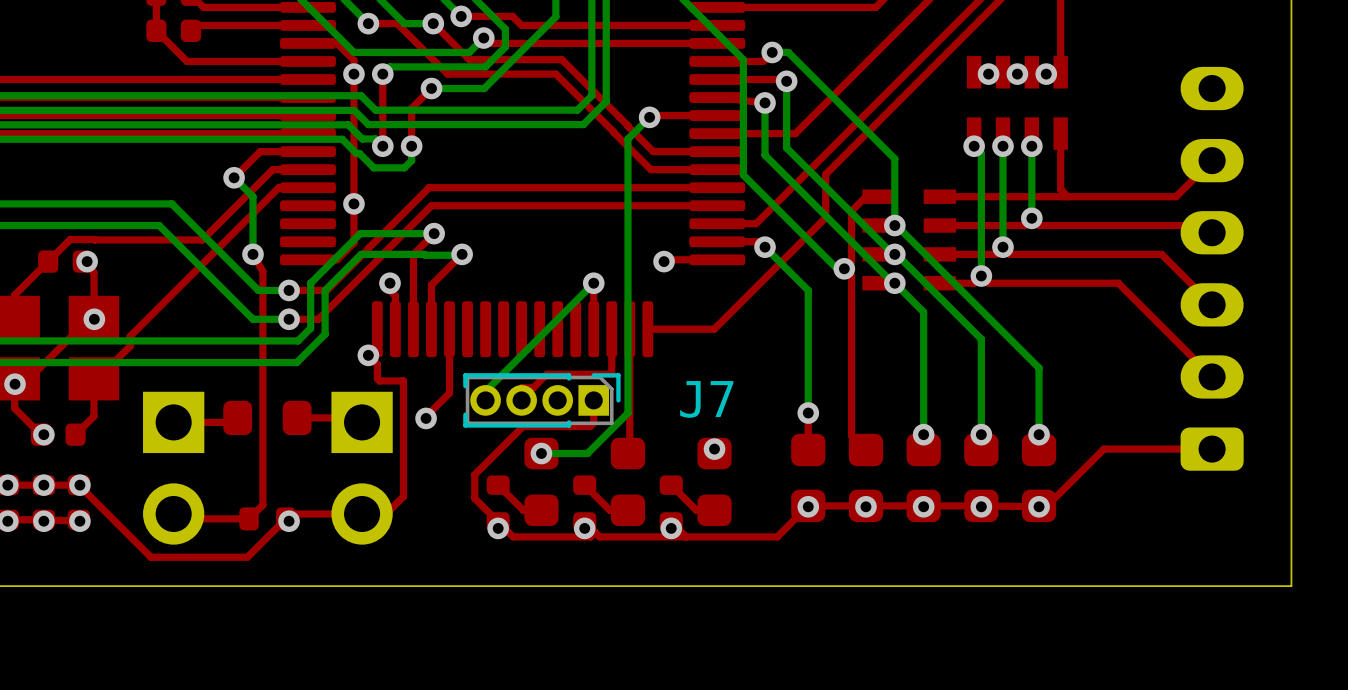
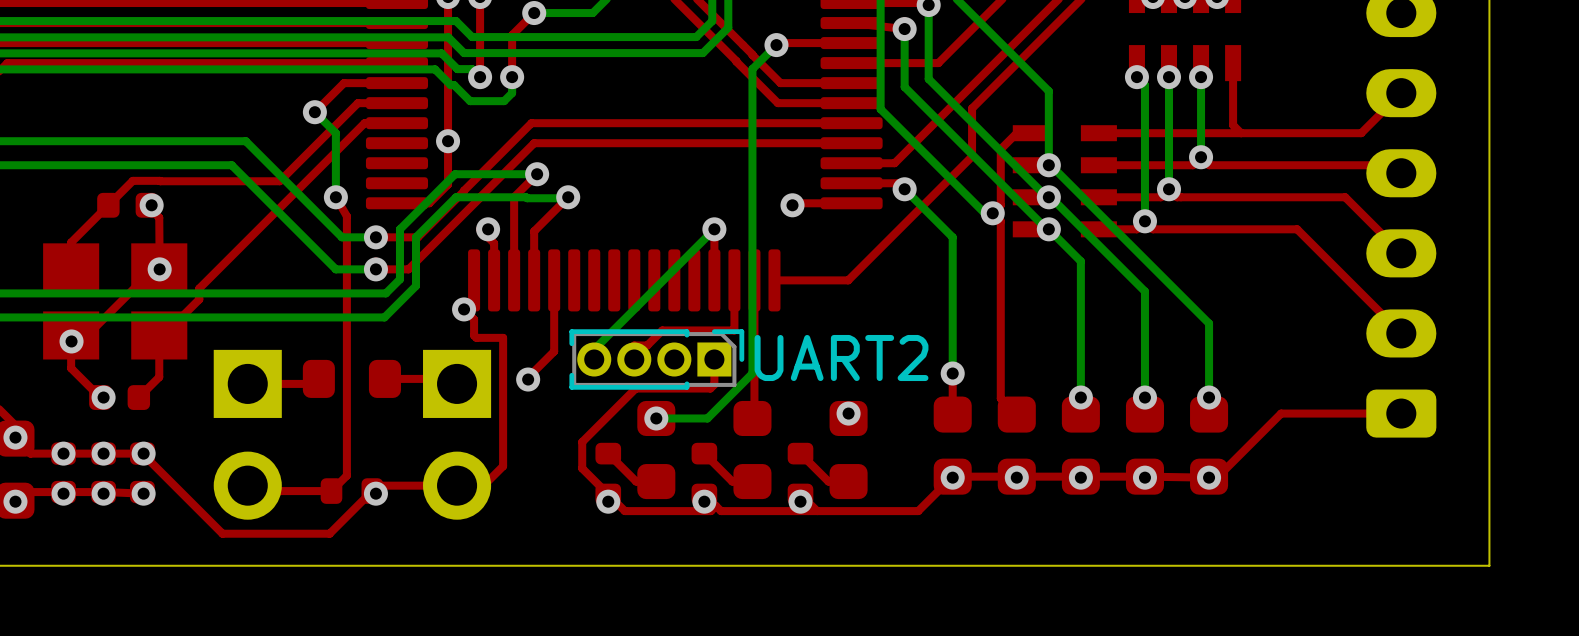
J7 name: J7 (706, 399) -> UART2 (841, 357)

